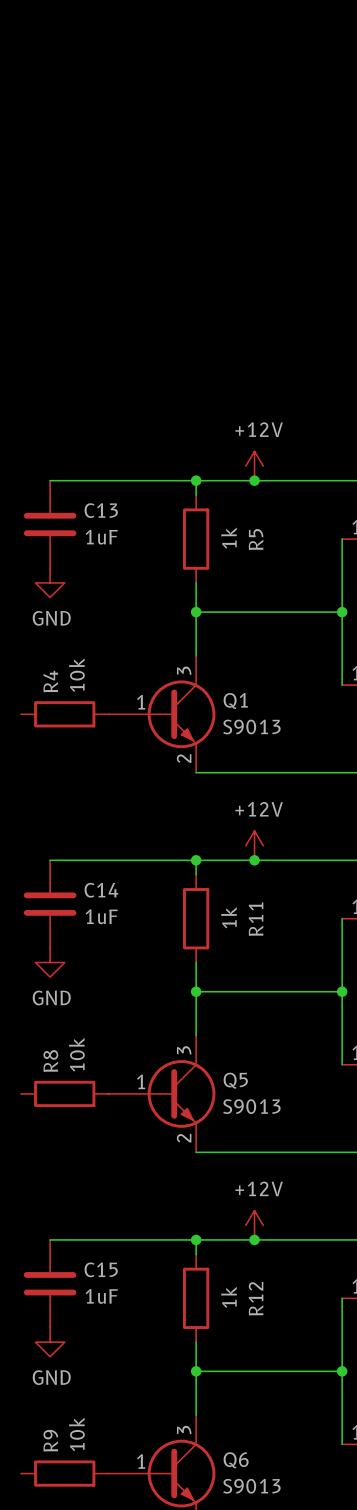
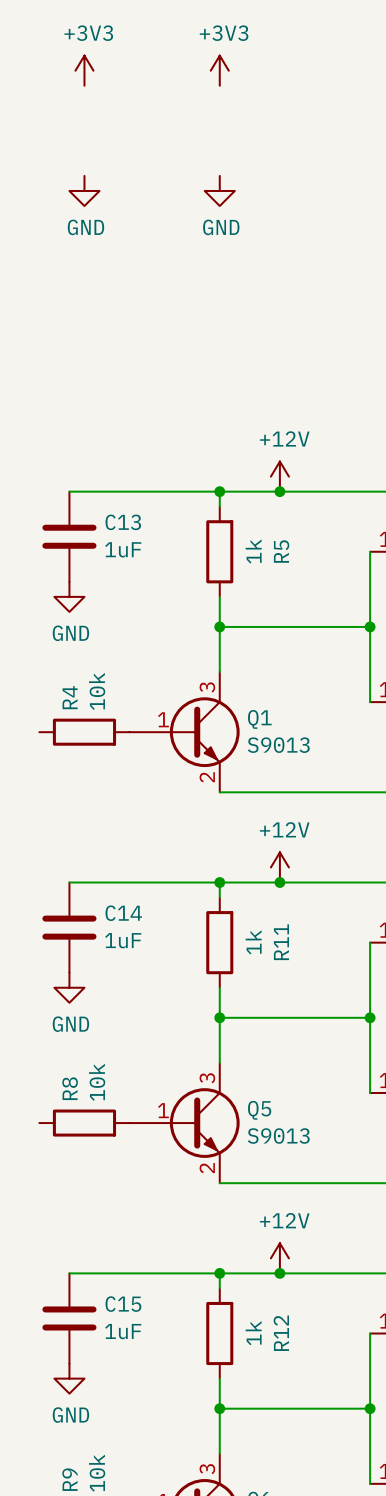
power symbol: none -> +3V3 (84, 70)
power symbol: none -> +3V3 (219, 70)
power symbol: none -> GND (84, 190)
power symbol: none -> GND (219, 190)

